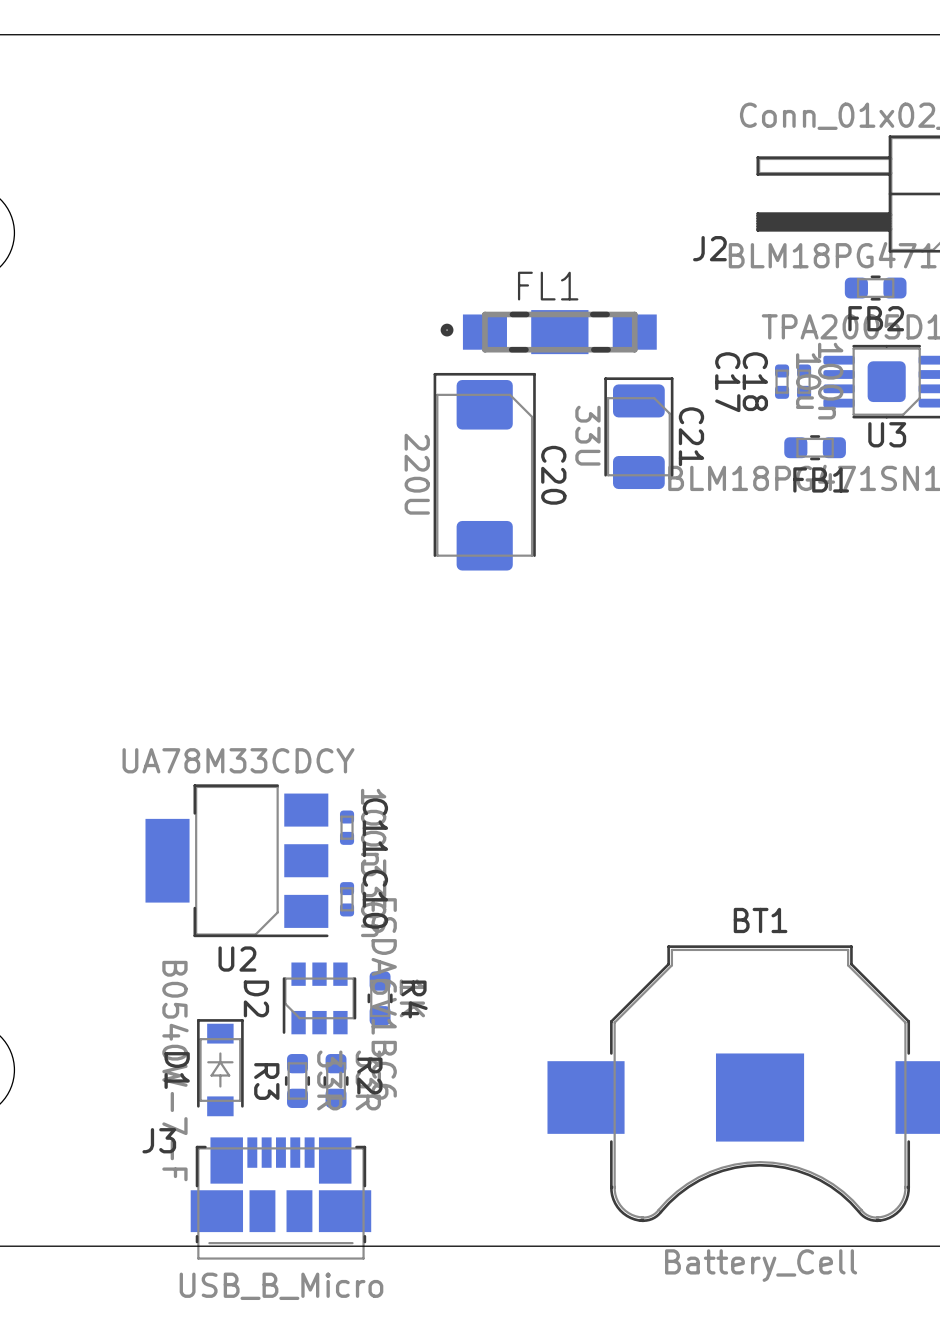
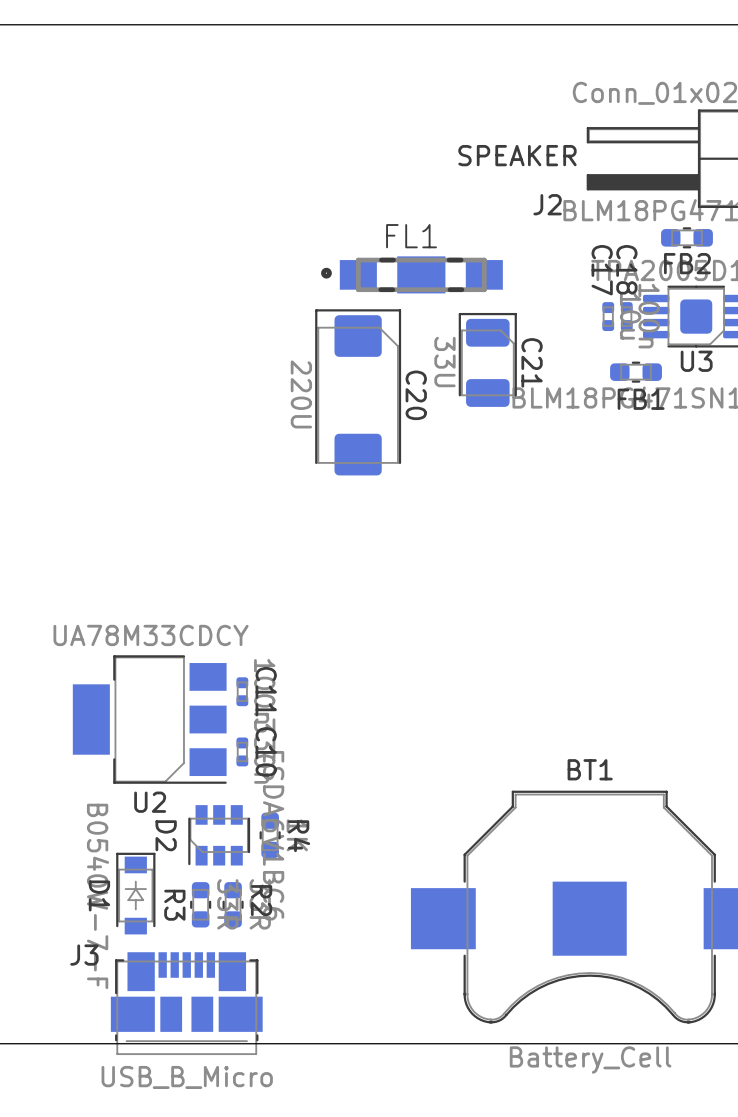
text: none -> SPEAKER (517, 155)
C18 name position: C18 (755, 381) -> C18 (626, 269)
C17 name position: C17 (727, 382) -> C17 (602, 270)

